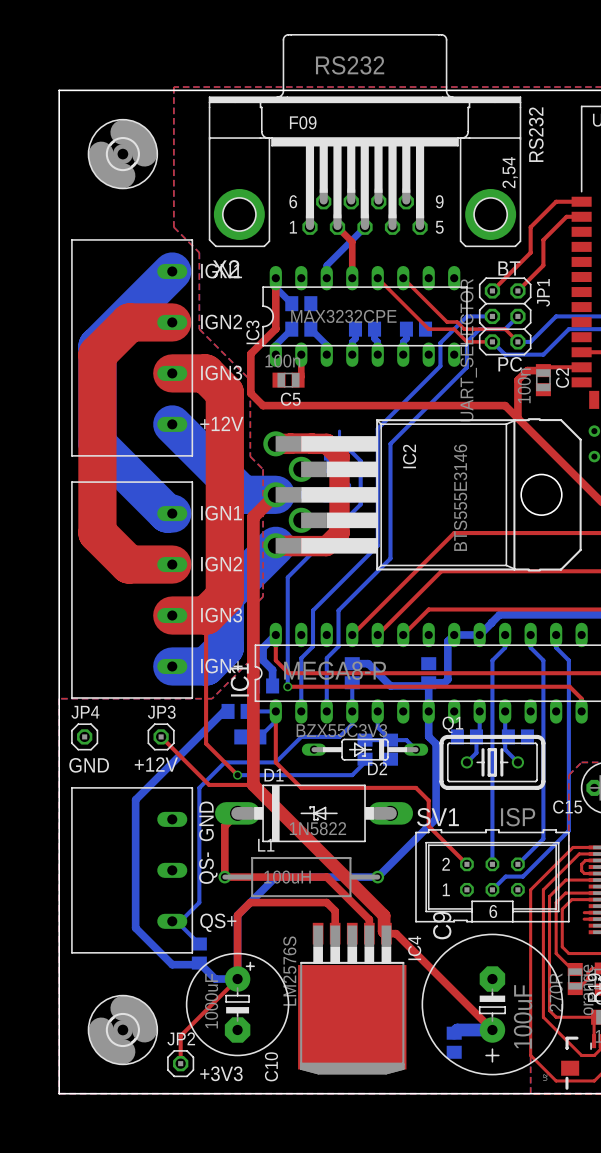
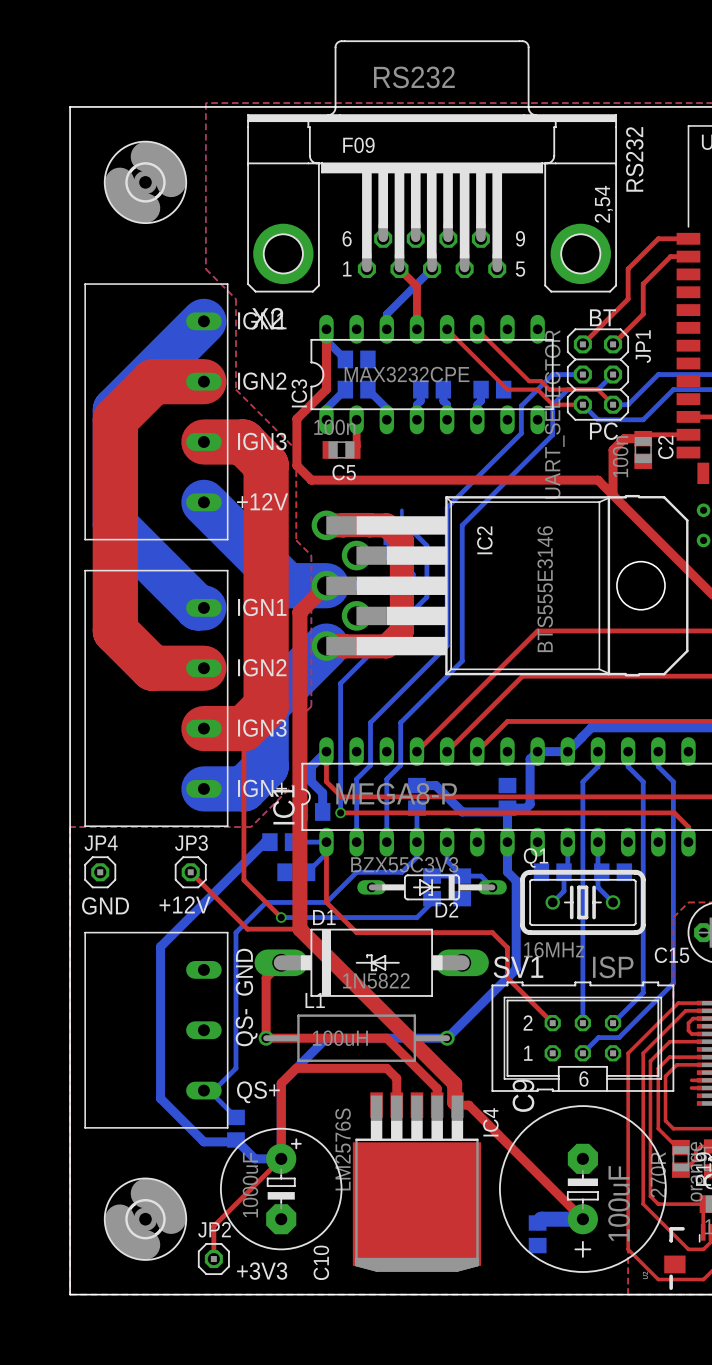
Q1 value: none -> 16MHz (554, 949)

